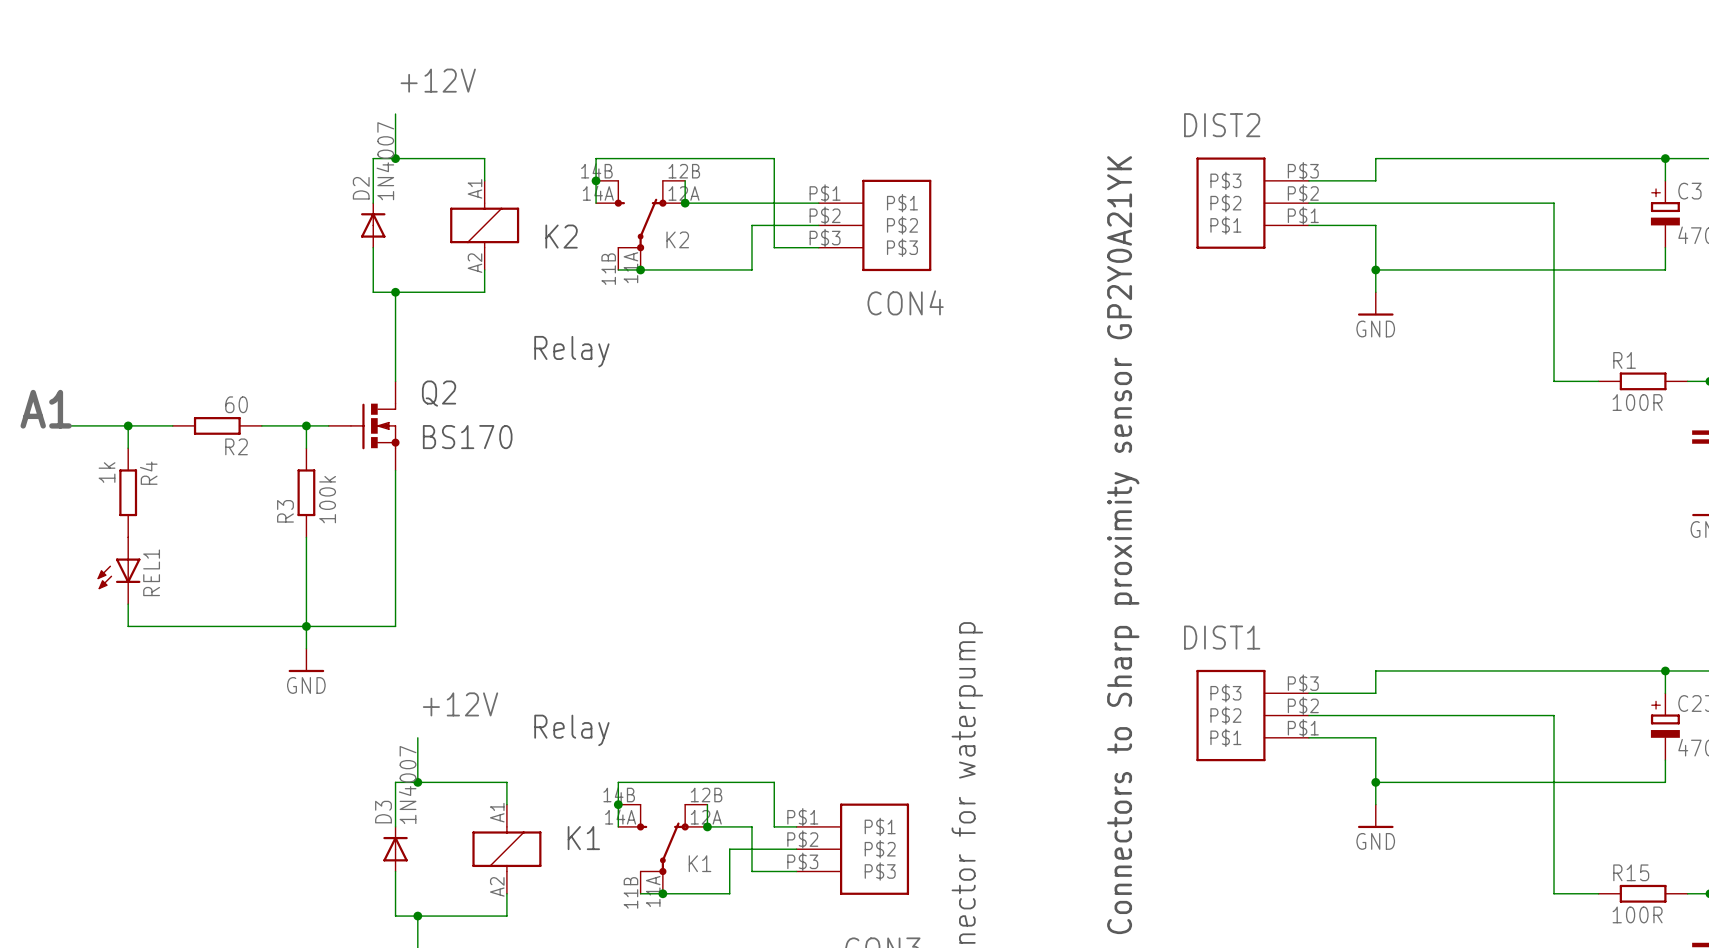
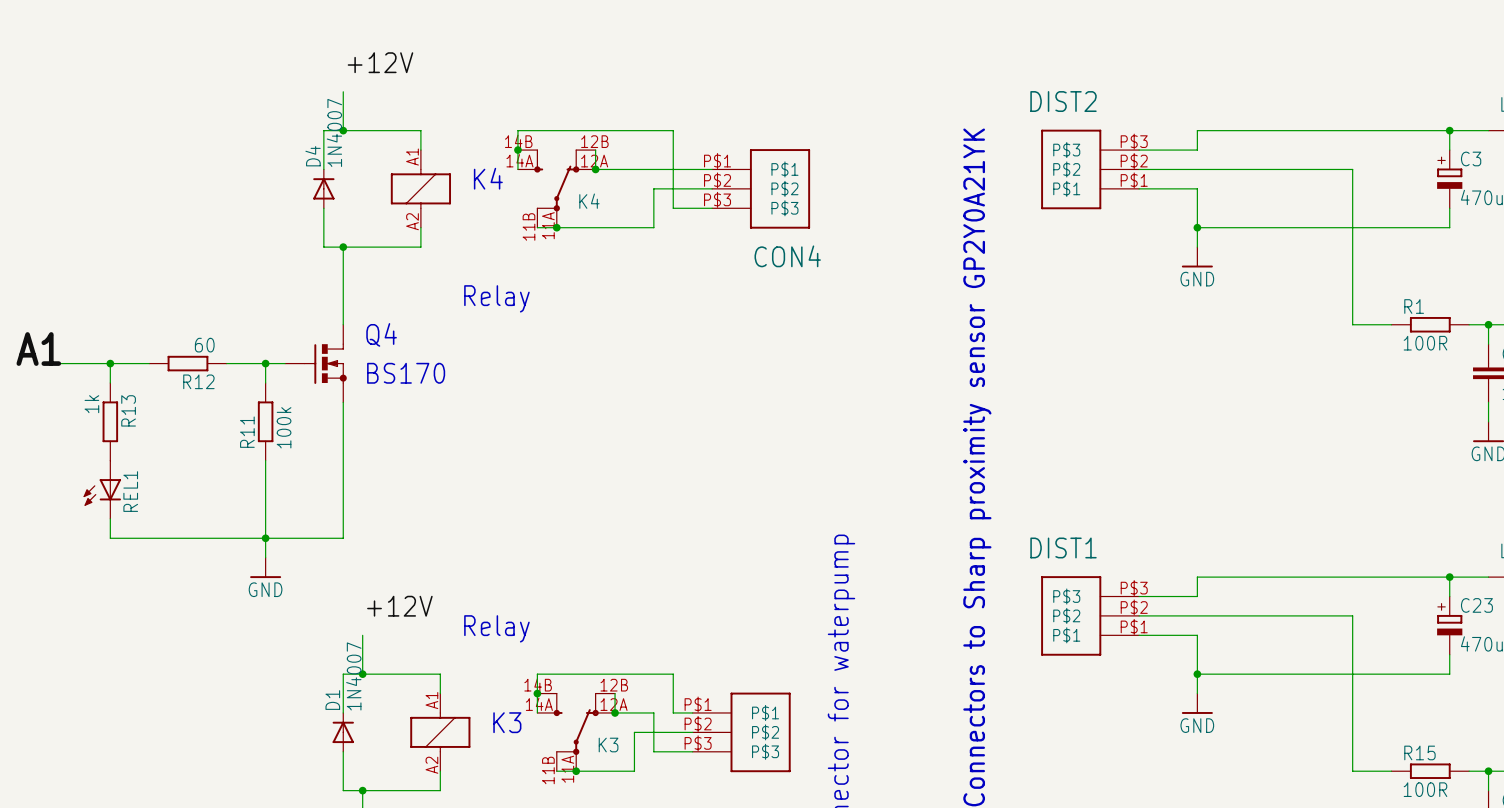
D2 name: D2 (361, 188) -> D4 (313, 156)
K2 name: K2 (561, 236) -> K4 (488, 178)
K2 name: K2 (677, 239) -> K4 (589, 201)
Q2 name: Q2 (439, 393) -> Q4 (381, 334)
R2 name: R2 (236, 446) -> R12 (198, 381)
R4 name: R4 (148, 473) -> R13 (128, 410)
R3 name: R3 (285, 511) -> R11 (247, 432)
D3 name: D3 (383, 812) -> D1 (332, 700)
K1 name: K1 (583, 838) -> K3 (507, 722)
K1 name: K1 (700, 863) -> K3 (608, 745)

